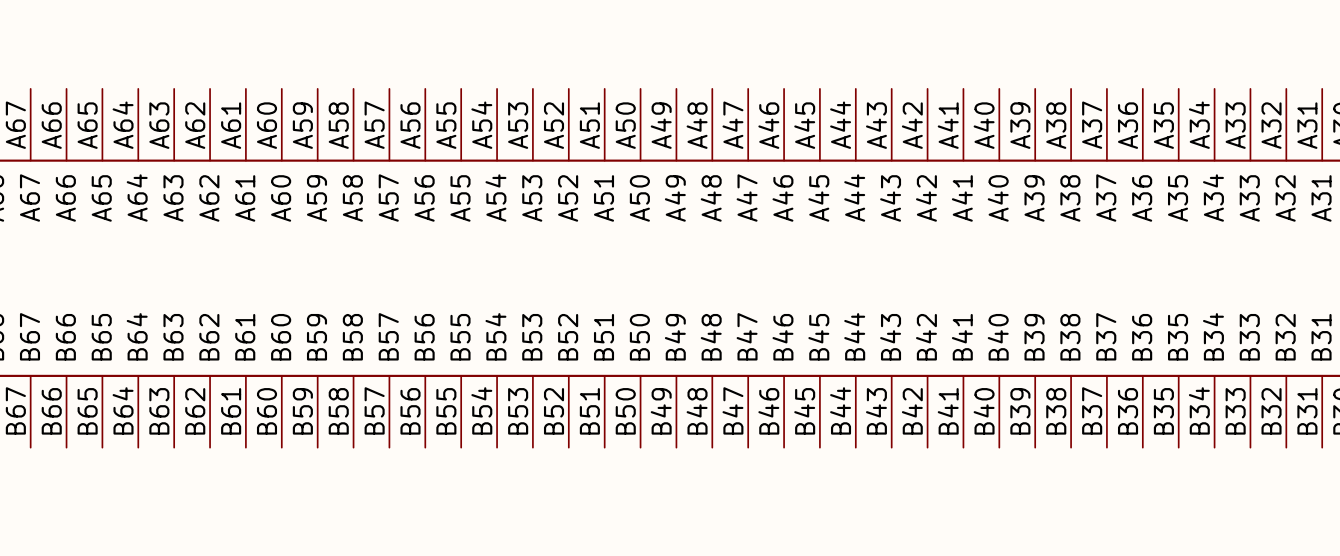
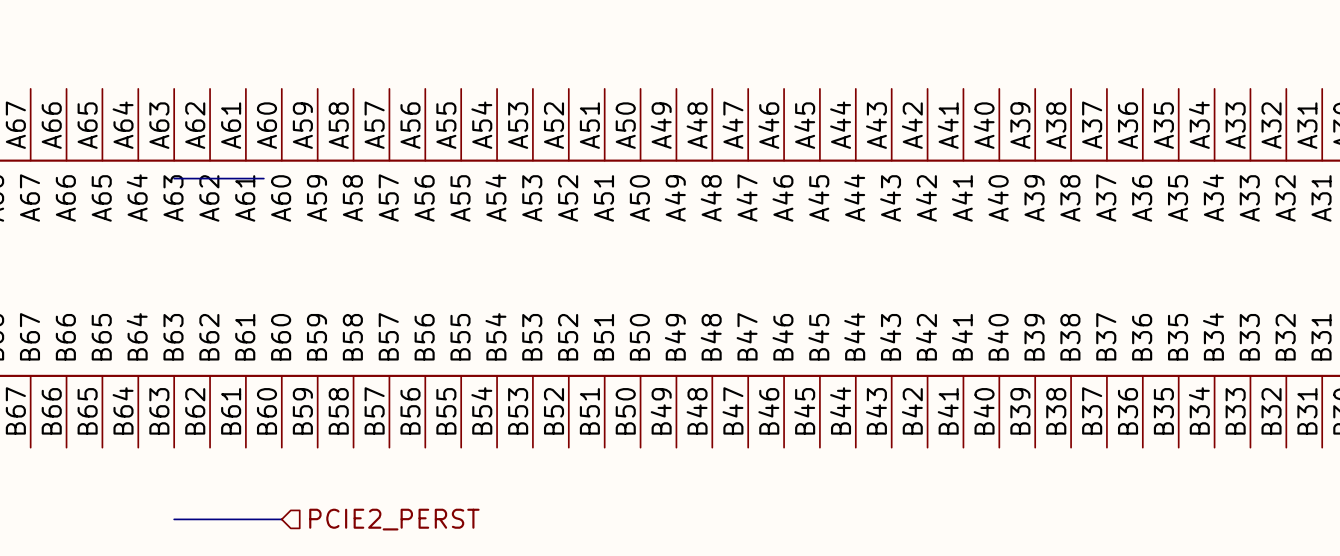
wire: none -> (174, 178) (263, 178)
wire: none -> (174, 519) (281, 519)
hierarchical label: none -> PCIE2_PERST (394, 519)

